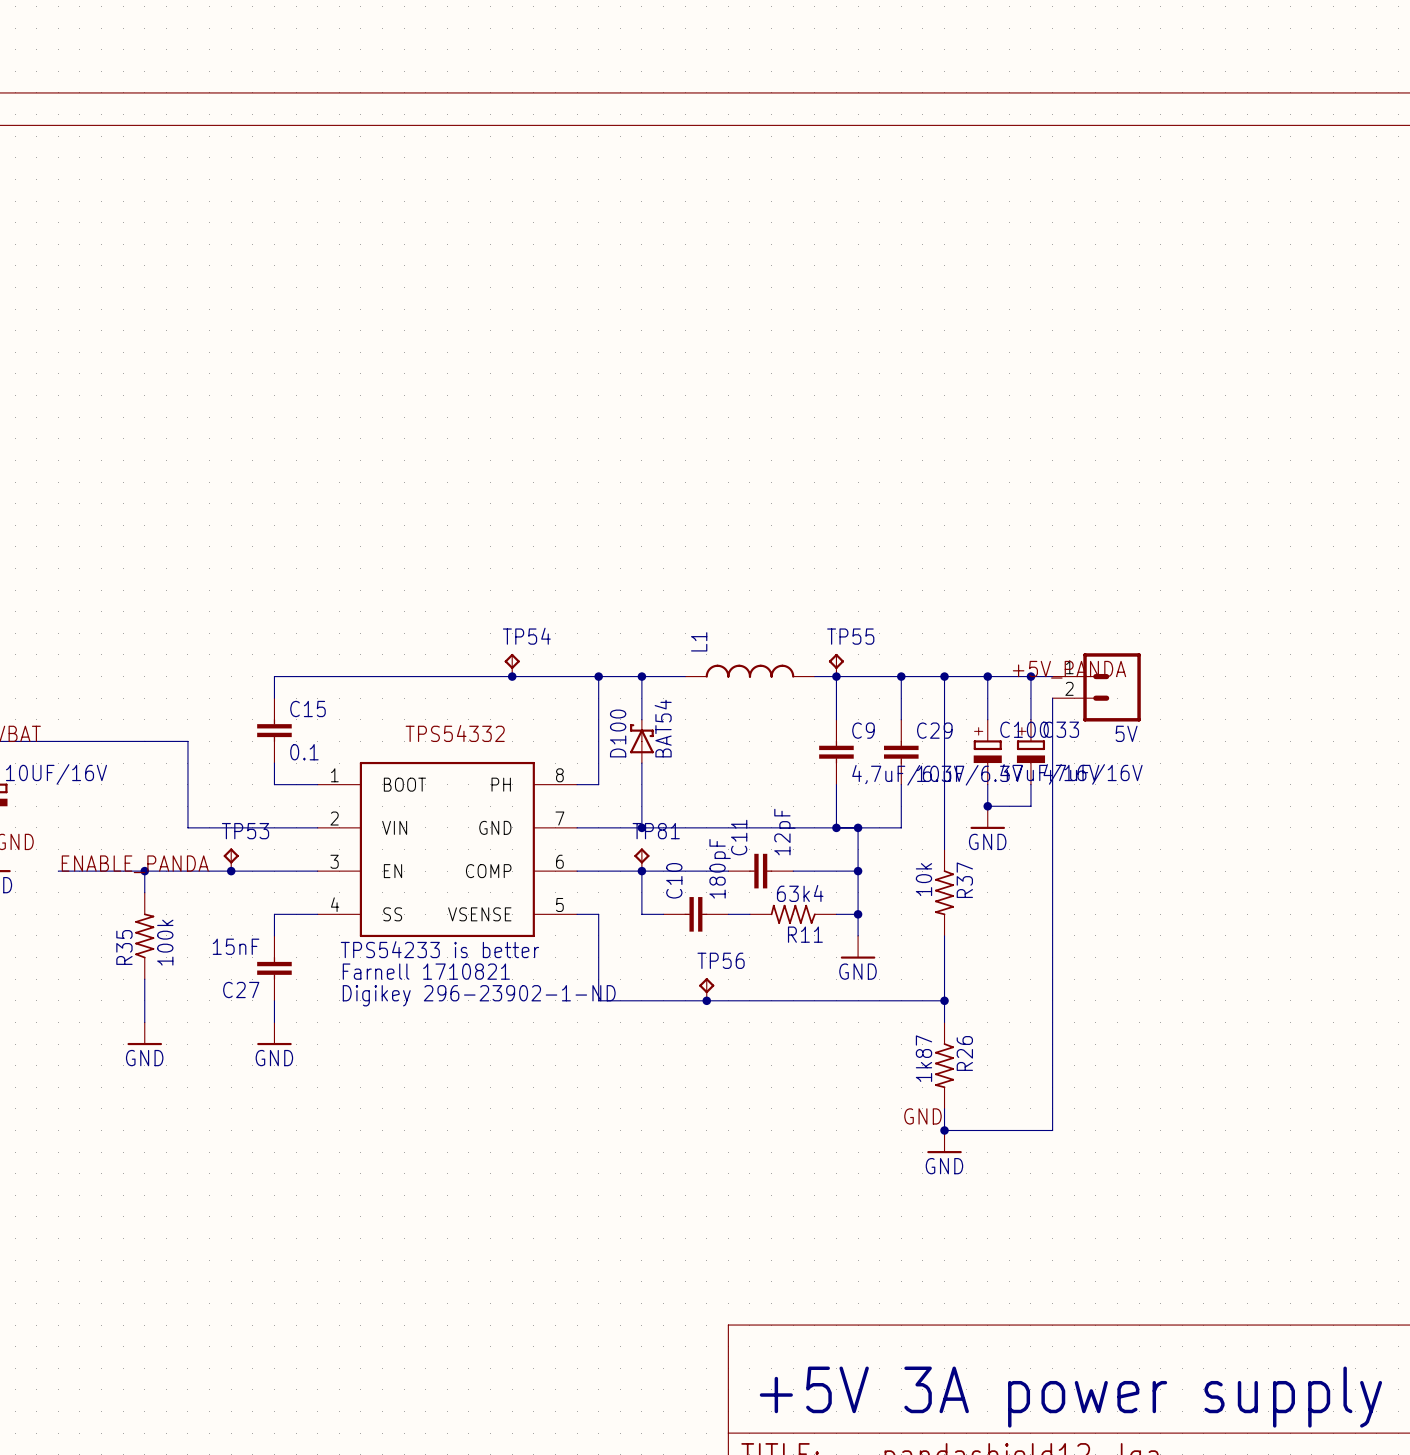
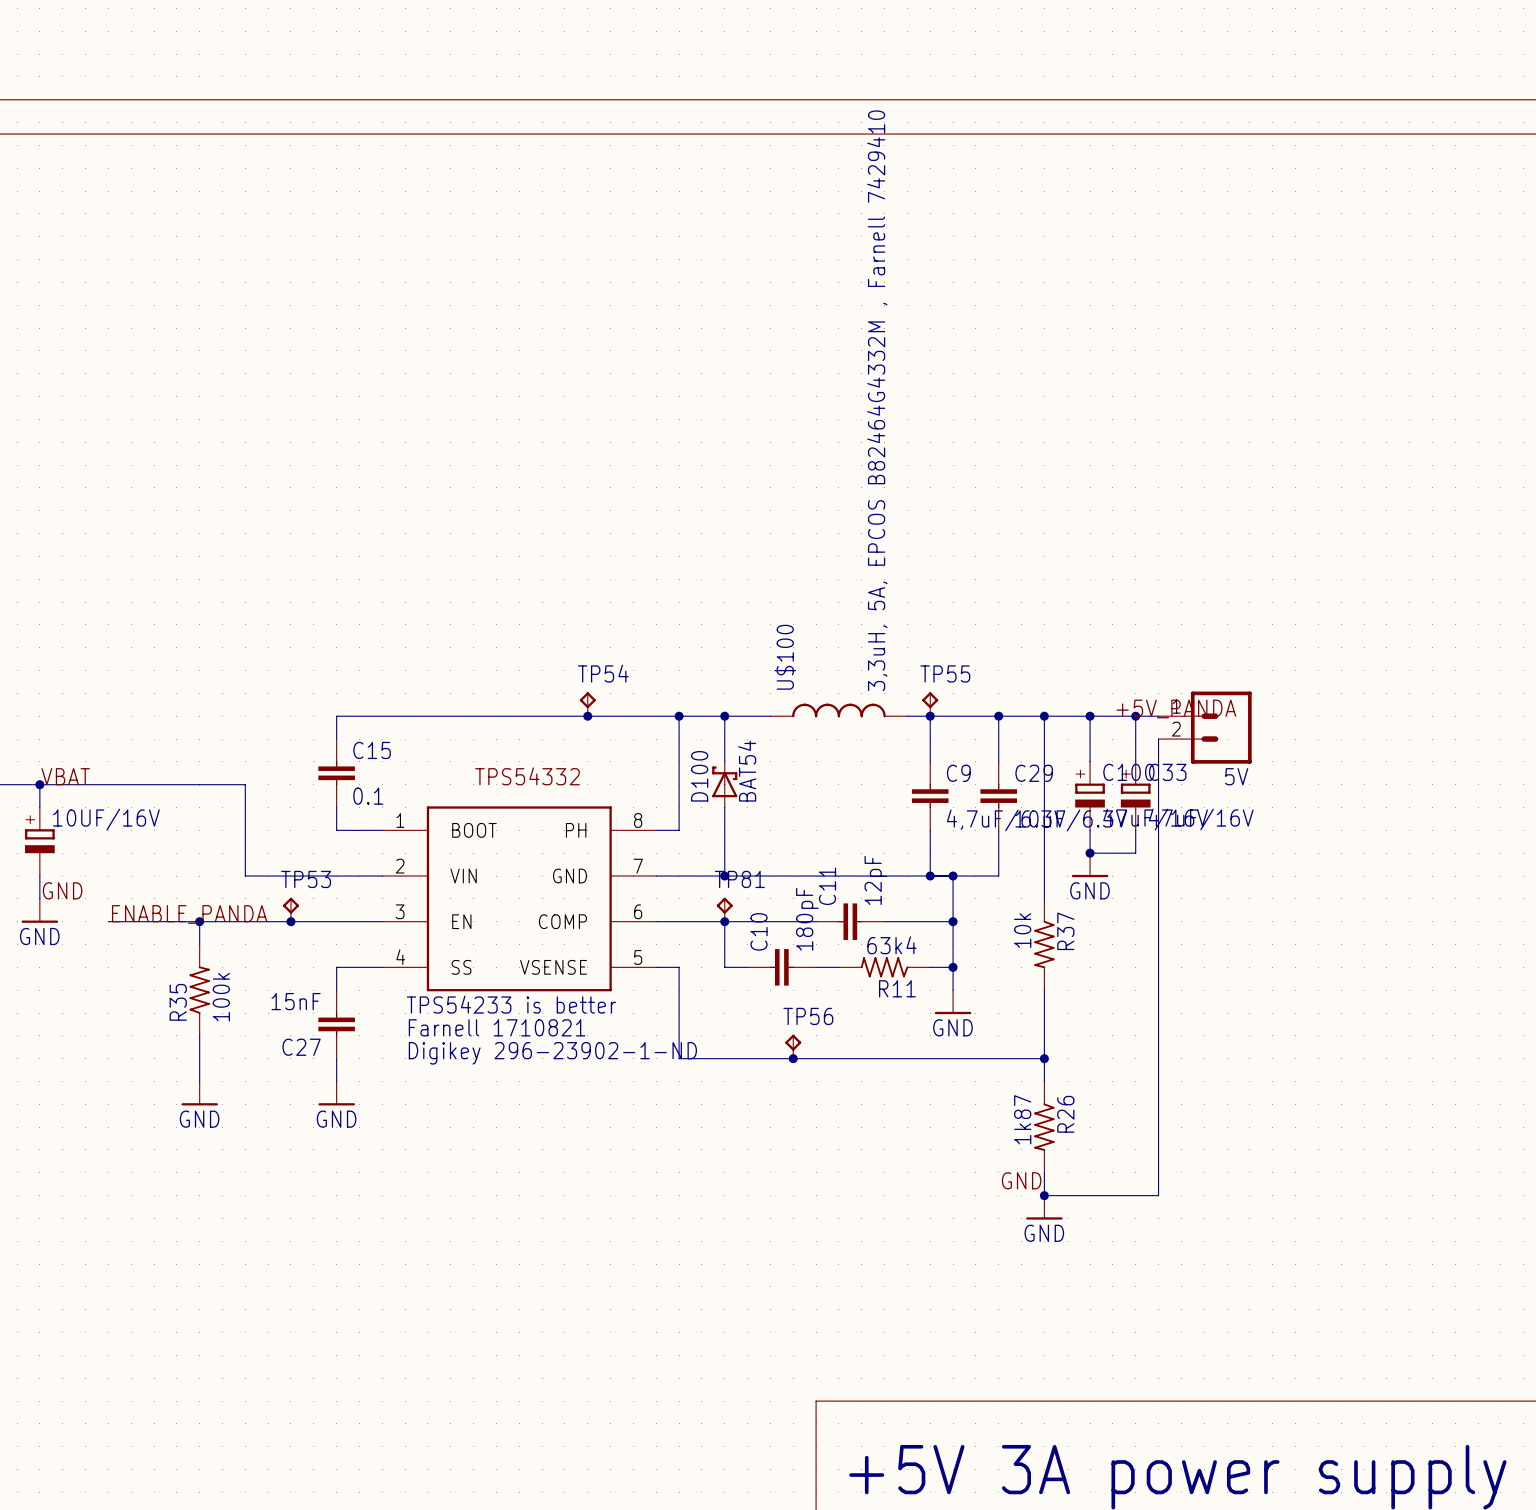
L1 value: none -> 3,3uH, 5A, EPCOS B82464G4332M , Farnell 7429410 (877, 400)
L1 name: L1 (699, 641) -> U$100 (785, 657)

